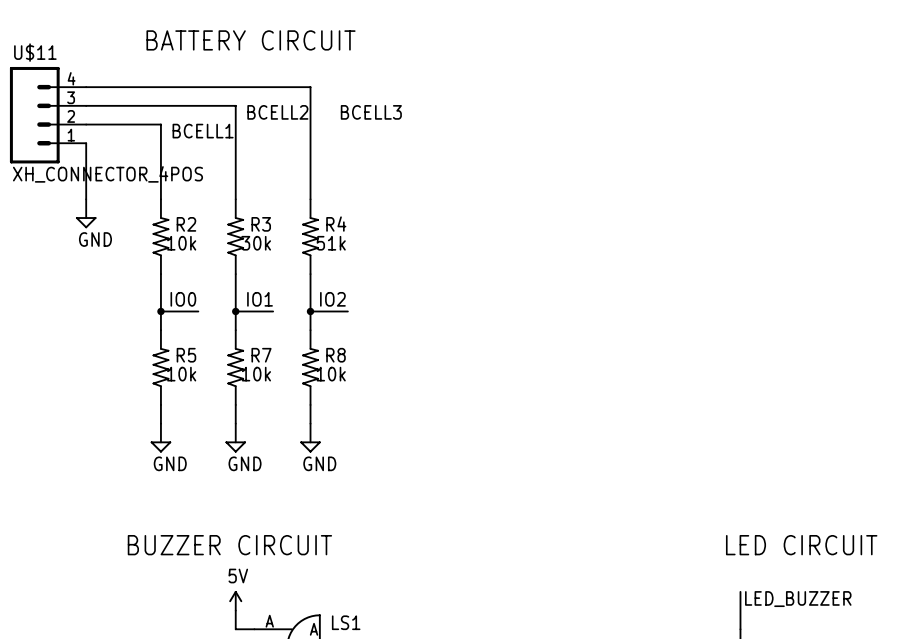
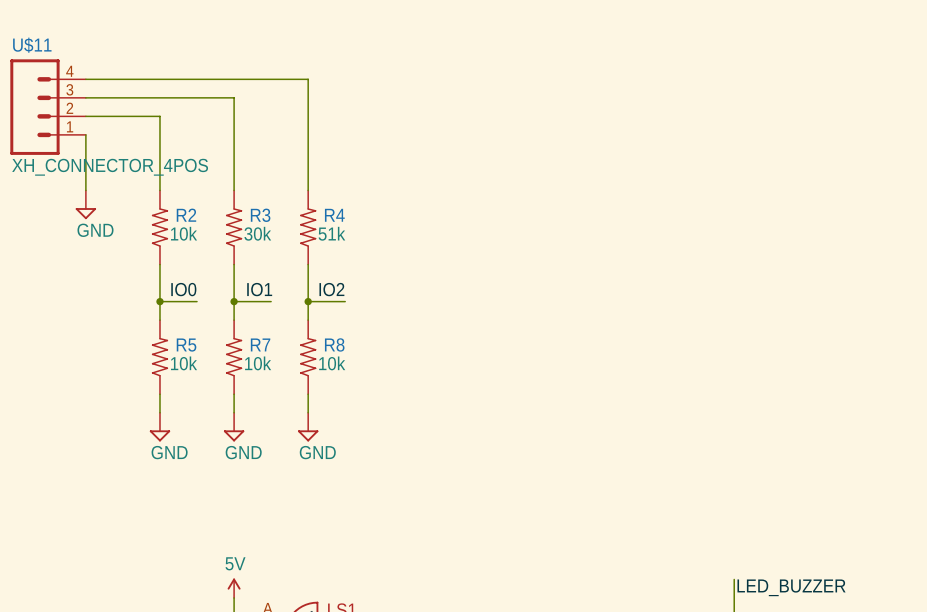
text: BATTERY CIRCUIT (251, 40) -> none
label: BCELL2 (277, 112) -> none
label: BCELL3 (371, 112) -> none
label: BCELL1 (203, 131) -> none
text: BUZZER CIRCUIT (229, 545) -> none
text: LED CIRCUIT (801, 545) -> none

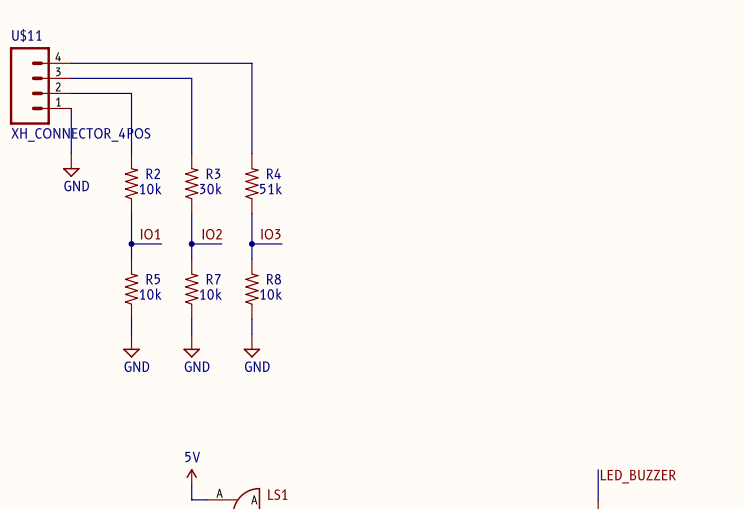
label: IO0 (183, 289) -> IO1 (150, 234)
label: IO1 (259, 289) -> IO2 (212, 234)
label: IO2 (331, 289) -> IO3 (270, 234)

